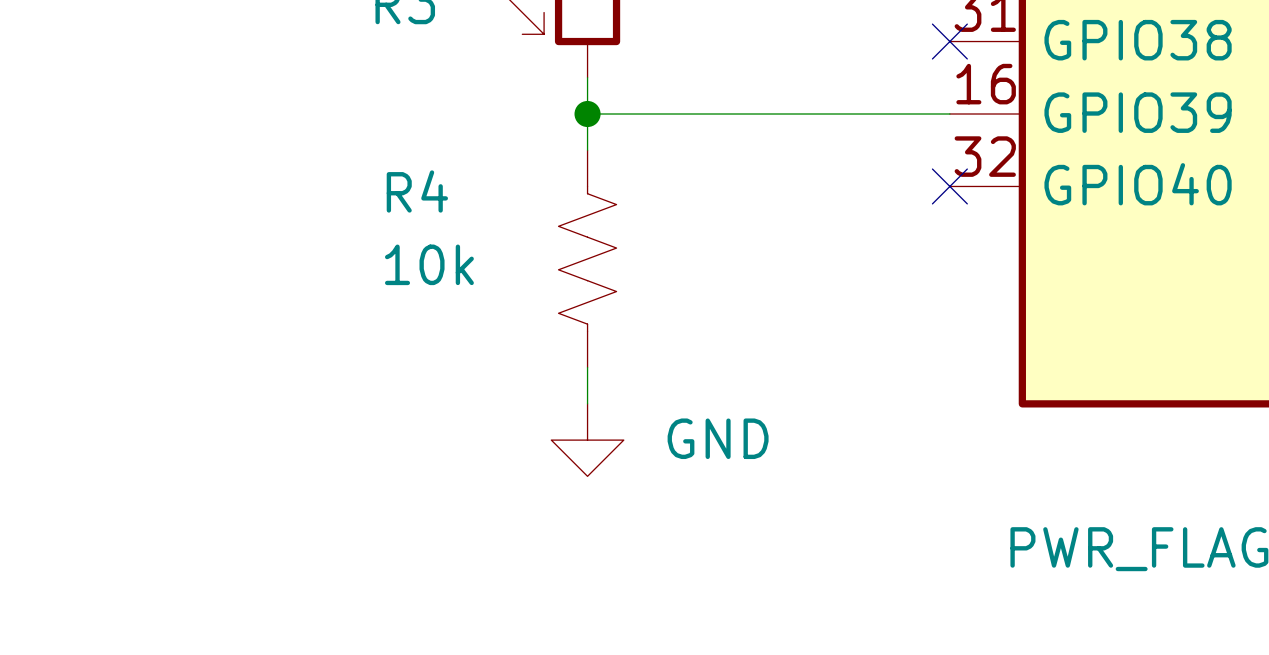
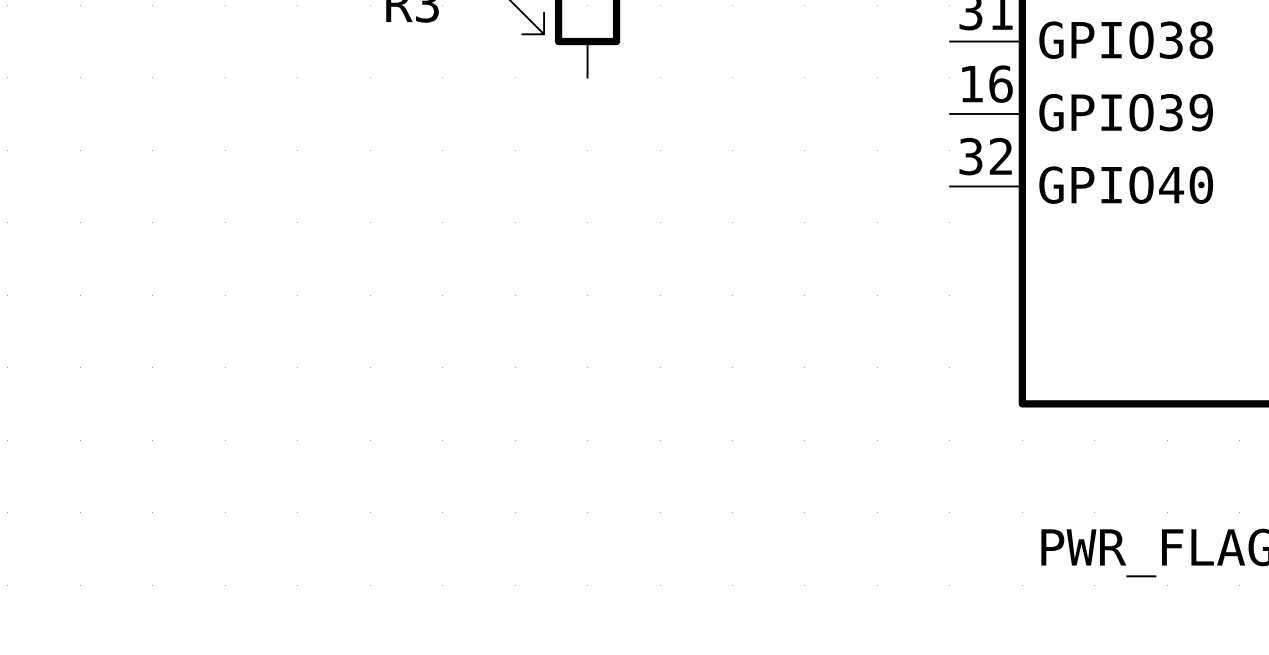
no-connect mark: (949, 41) -> none
wire: (587, 77) (587, 150) -> none
wire: (587, 114) (949, 114) -> none
junction: (587, 114) -> none
no-connect mark: (949, 186) -> none
R4: 10k (587, 258) -> none
wire: (587, 367) (587, 403) -> none
power symbol: GND (587, 440) -> none

